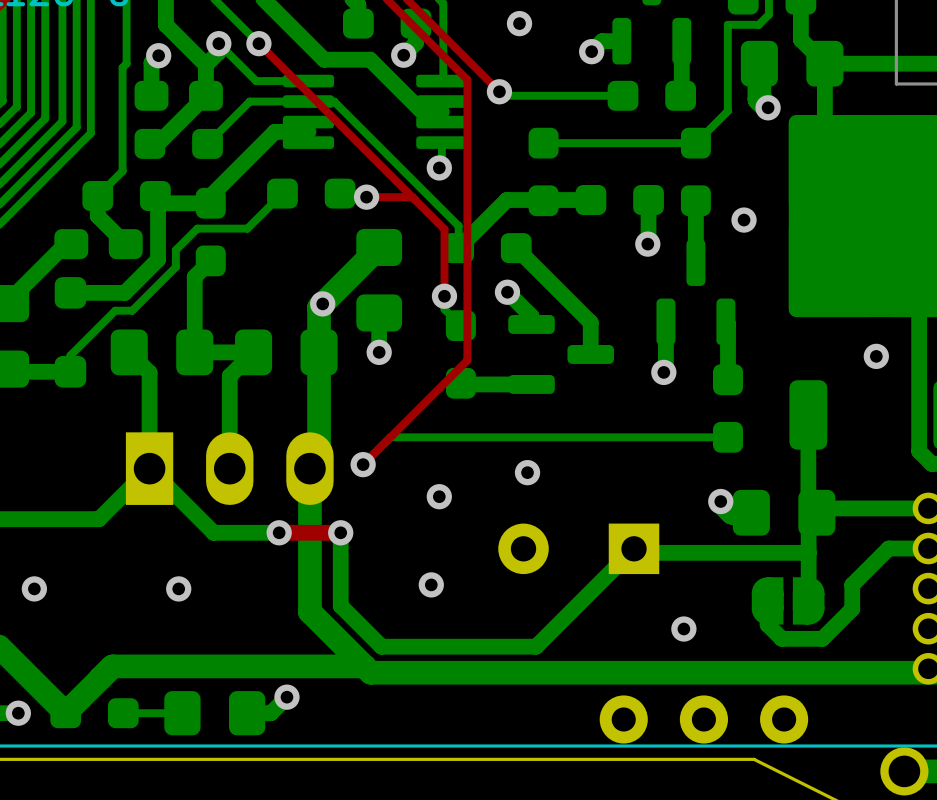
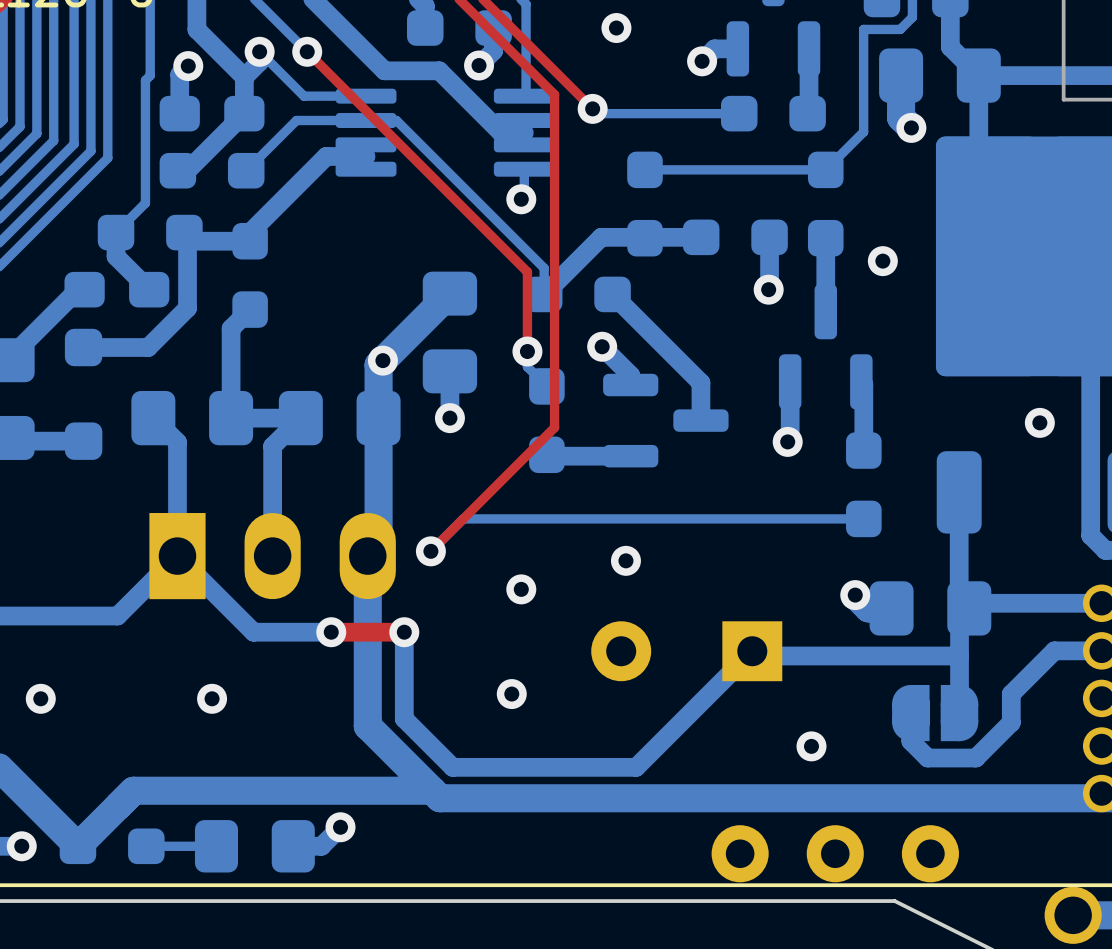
bottom track: (282, 193) (247, 228) (197, 228) (175, 250) (175, 267) (132, 310) (115, 310) (70, 355) (70, 371) -> none
part: (311, 193) -> none
top track: (366, 197) (412, 197) -> none
via: (366, 197) -> none

